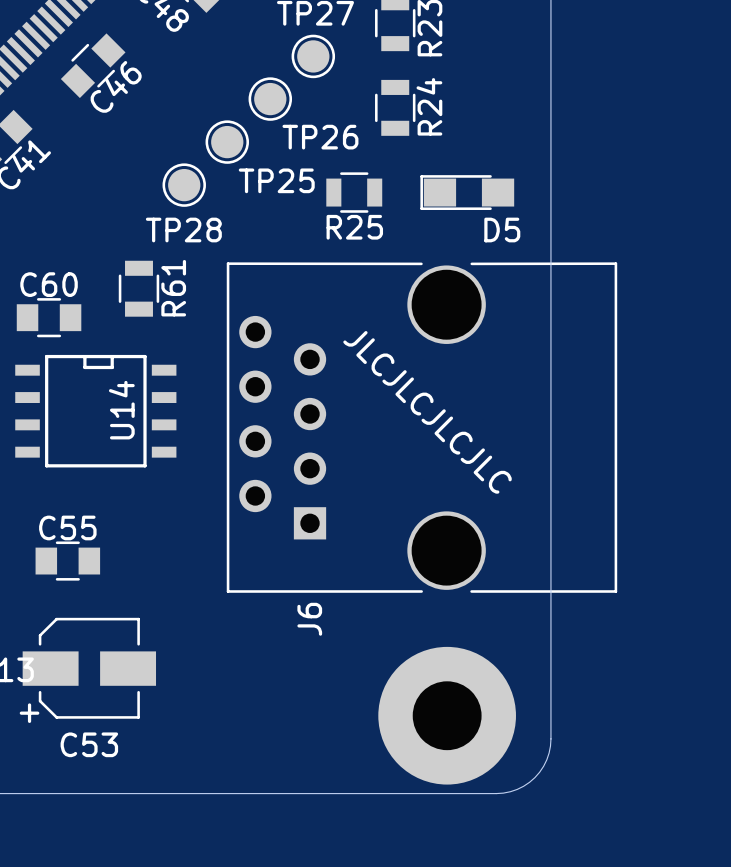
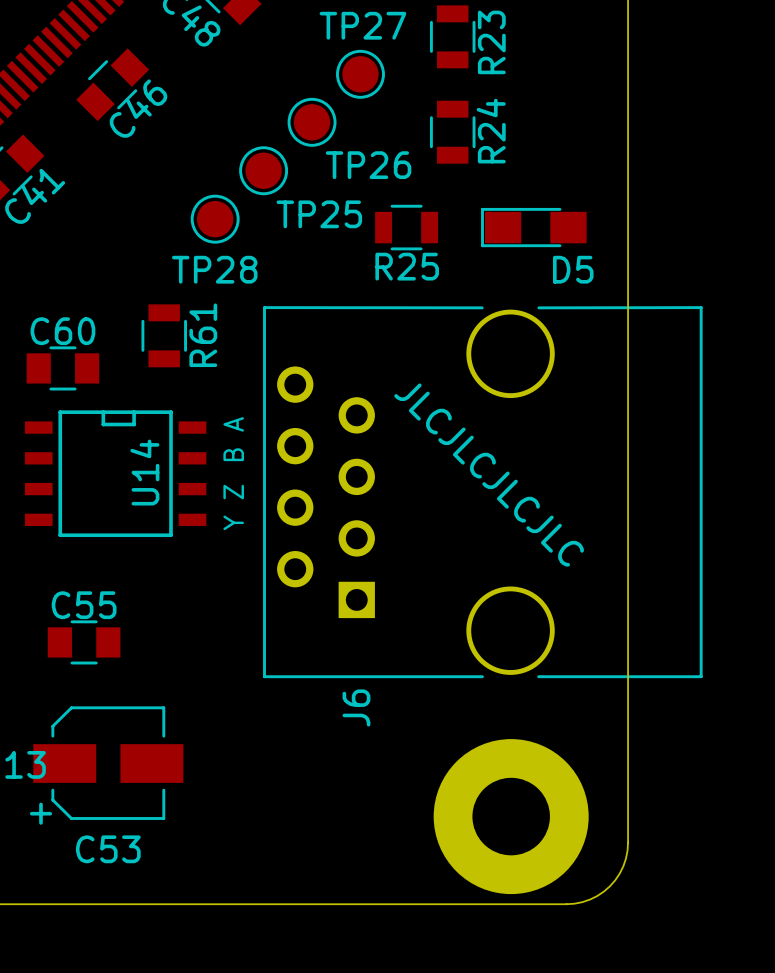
text: none -> A (233, 424)
text: none -> B (233, 454)
text: none -> Z (233, 492)
text: none -> Y (233, 522)

